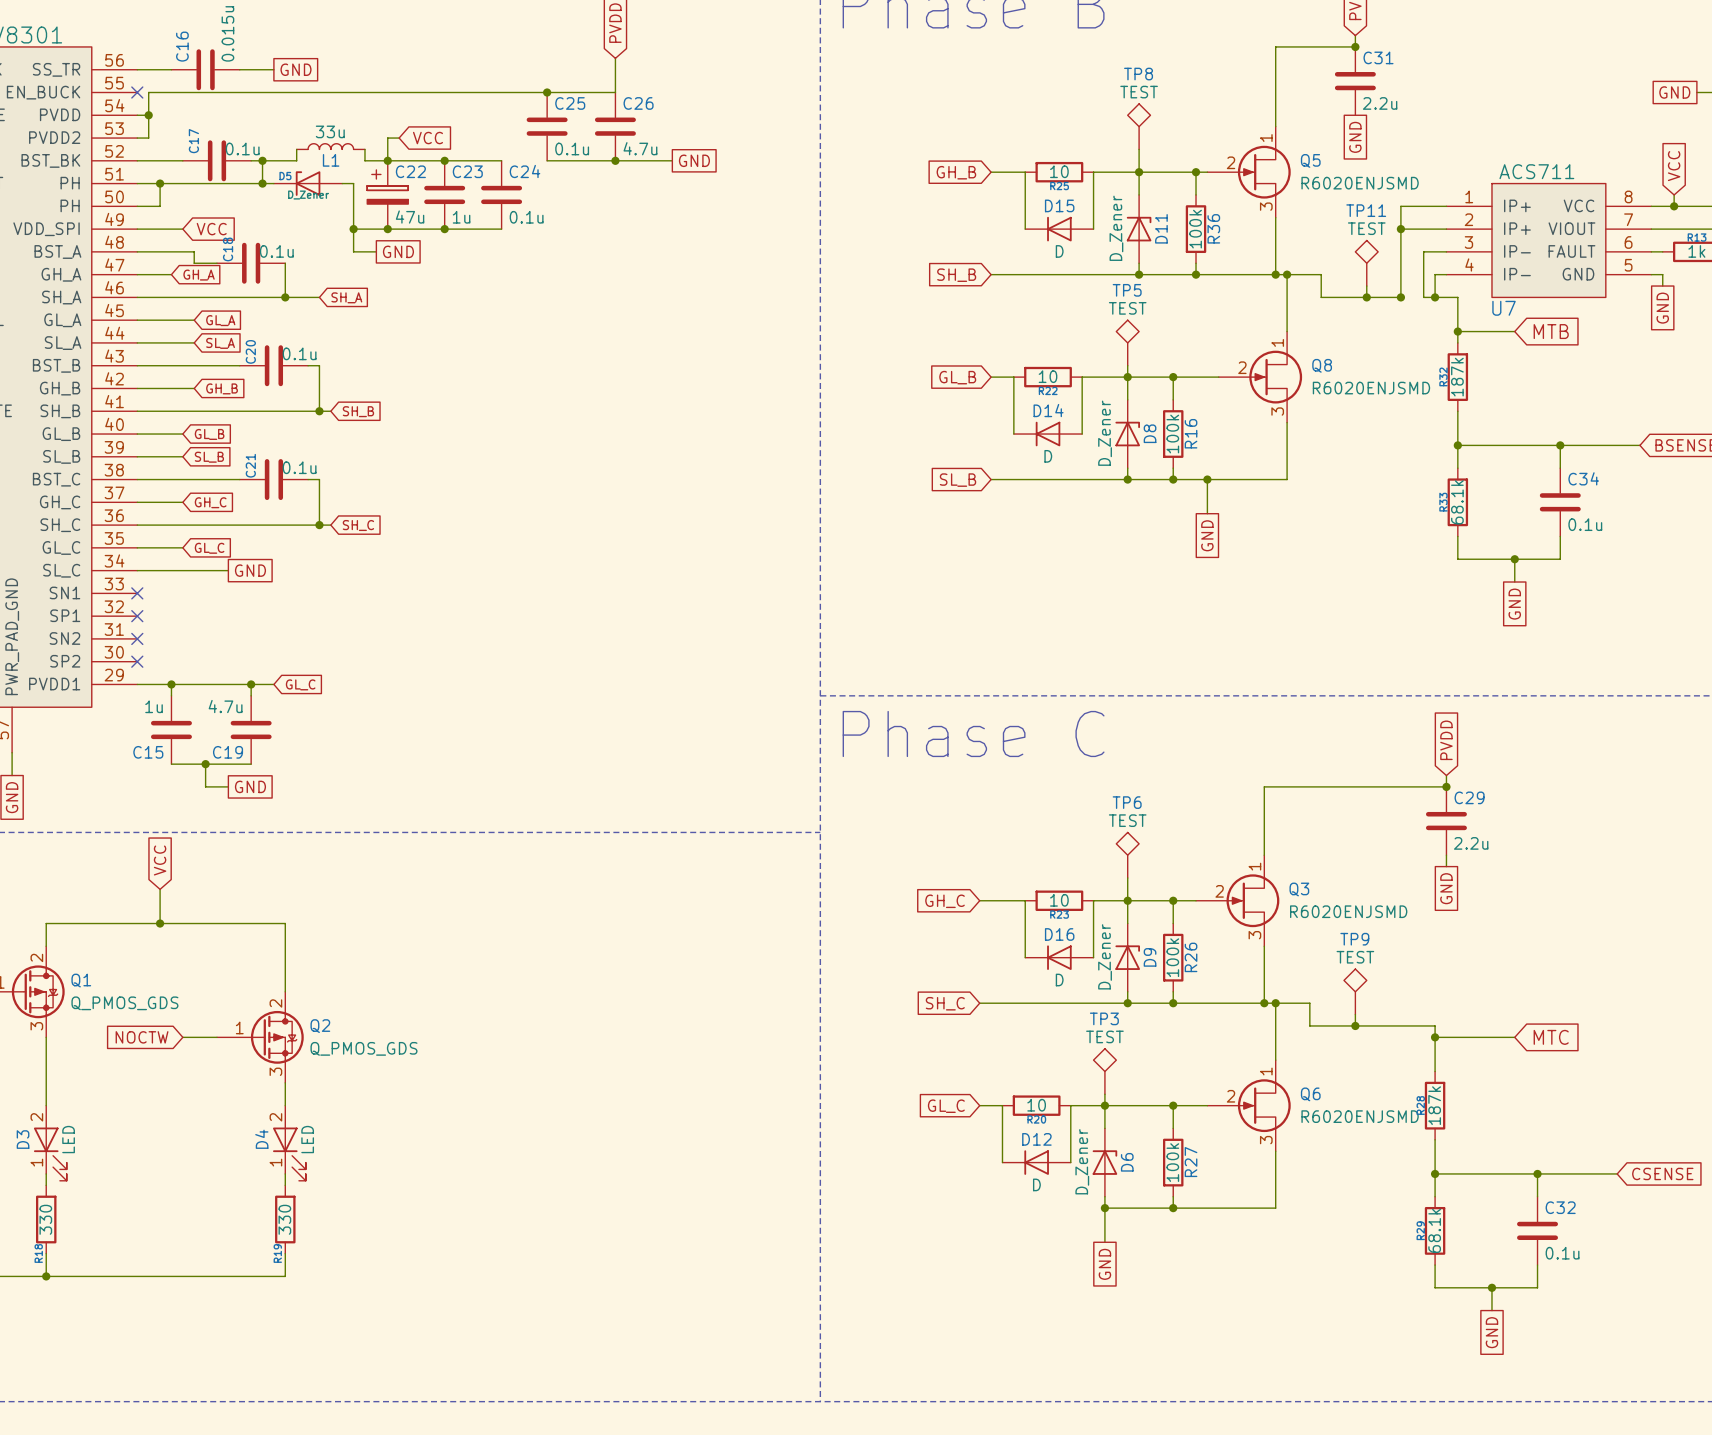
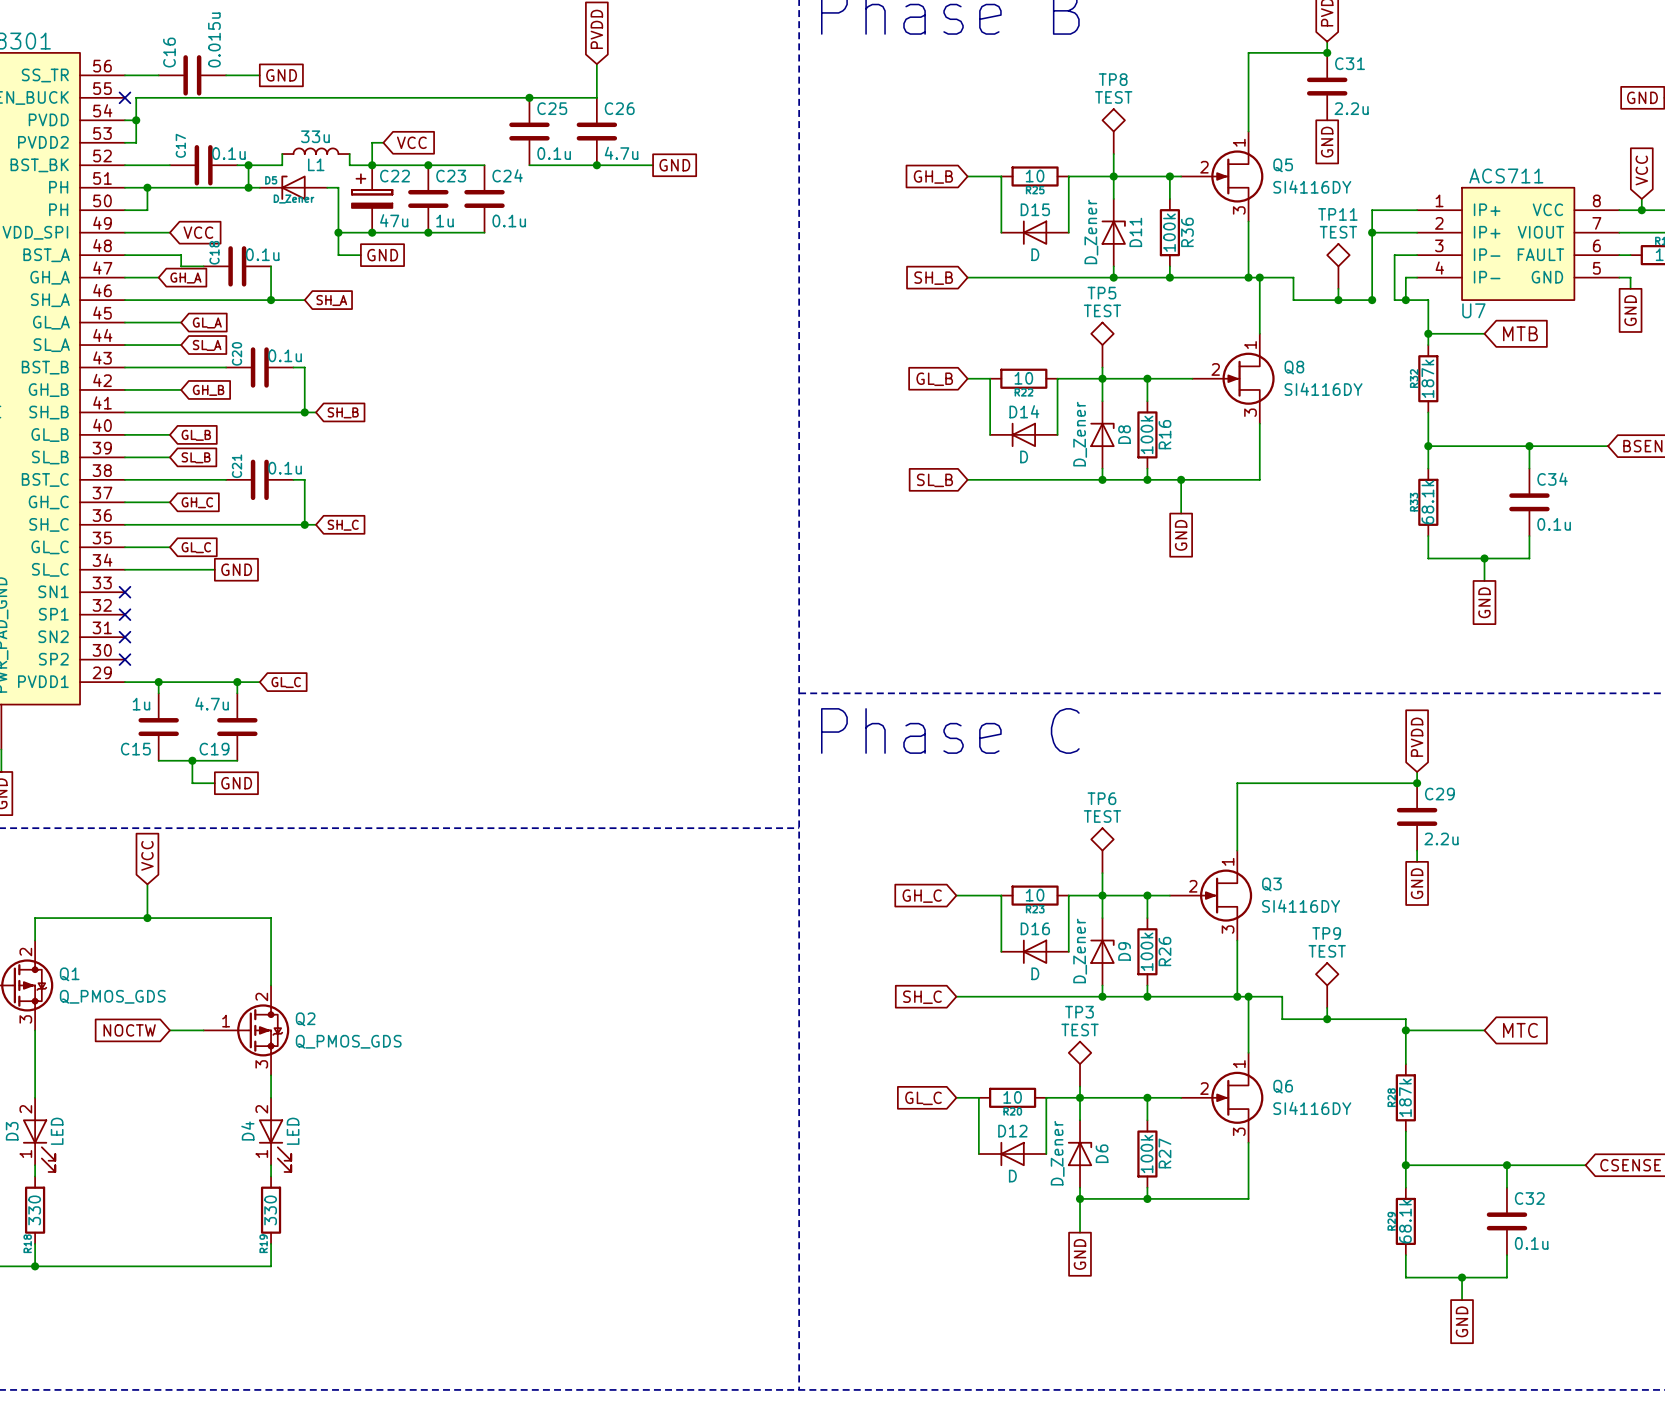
Q5 value: R6020ENJSMD (1360, 183) -> SI4116DY (1312, 187)
Q8 value: R6020ENJSMD (1371, 388) -> SI4116DY (1323, 389)
Q3 value: R6020ENJSMD (1348, 911) -> SI4116DY (1301, 906)
Q6 value: R6020ENJSMD (1360, 1116) -> SI4116DY (1312, 1108)

